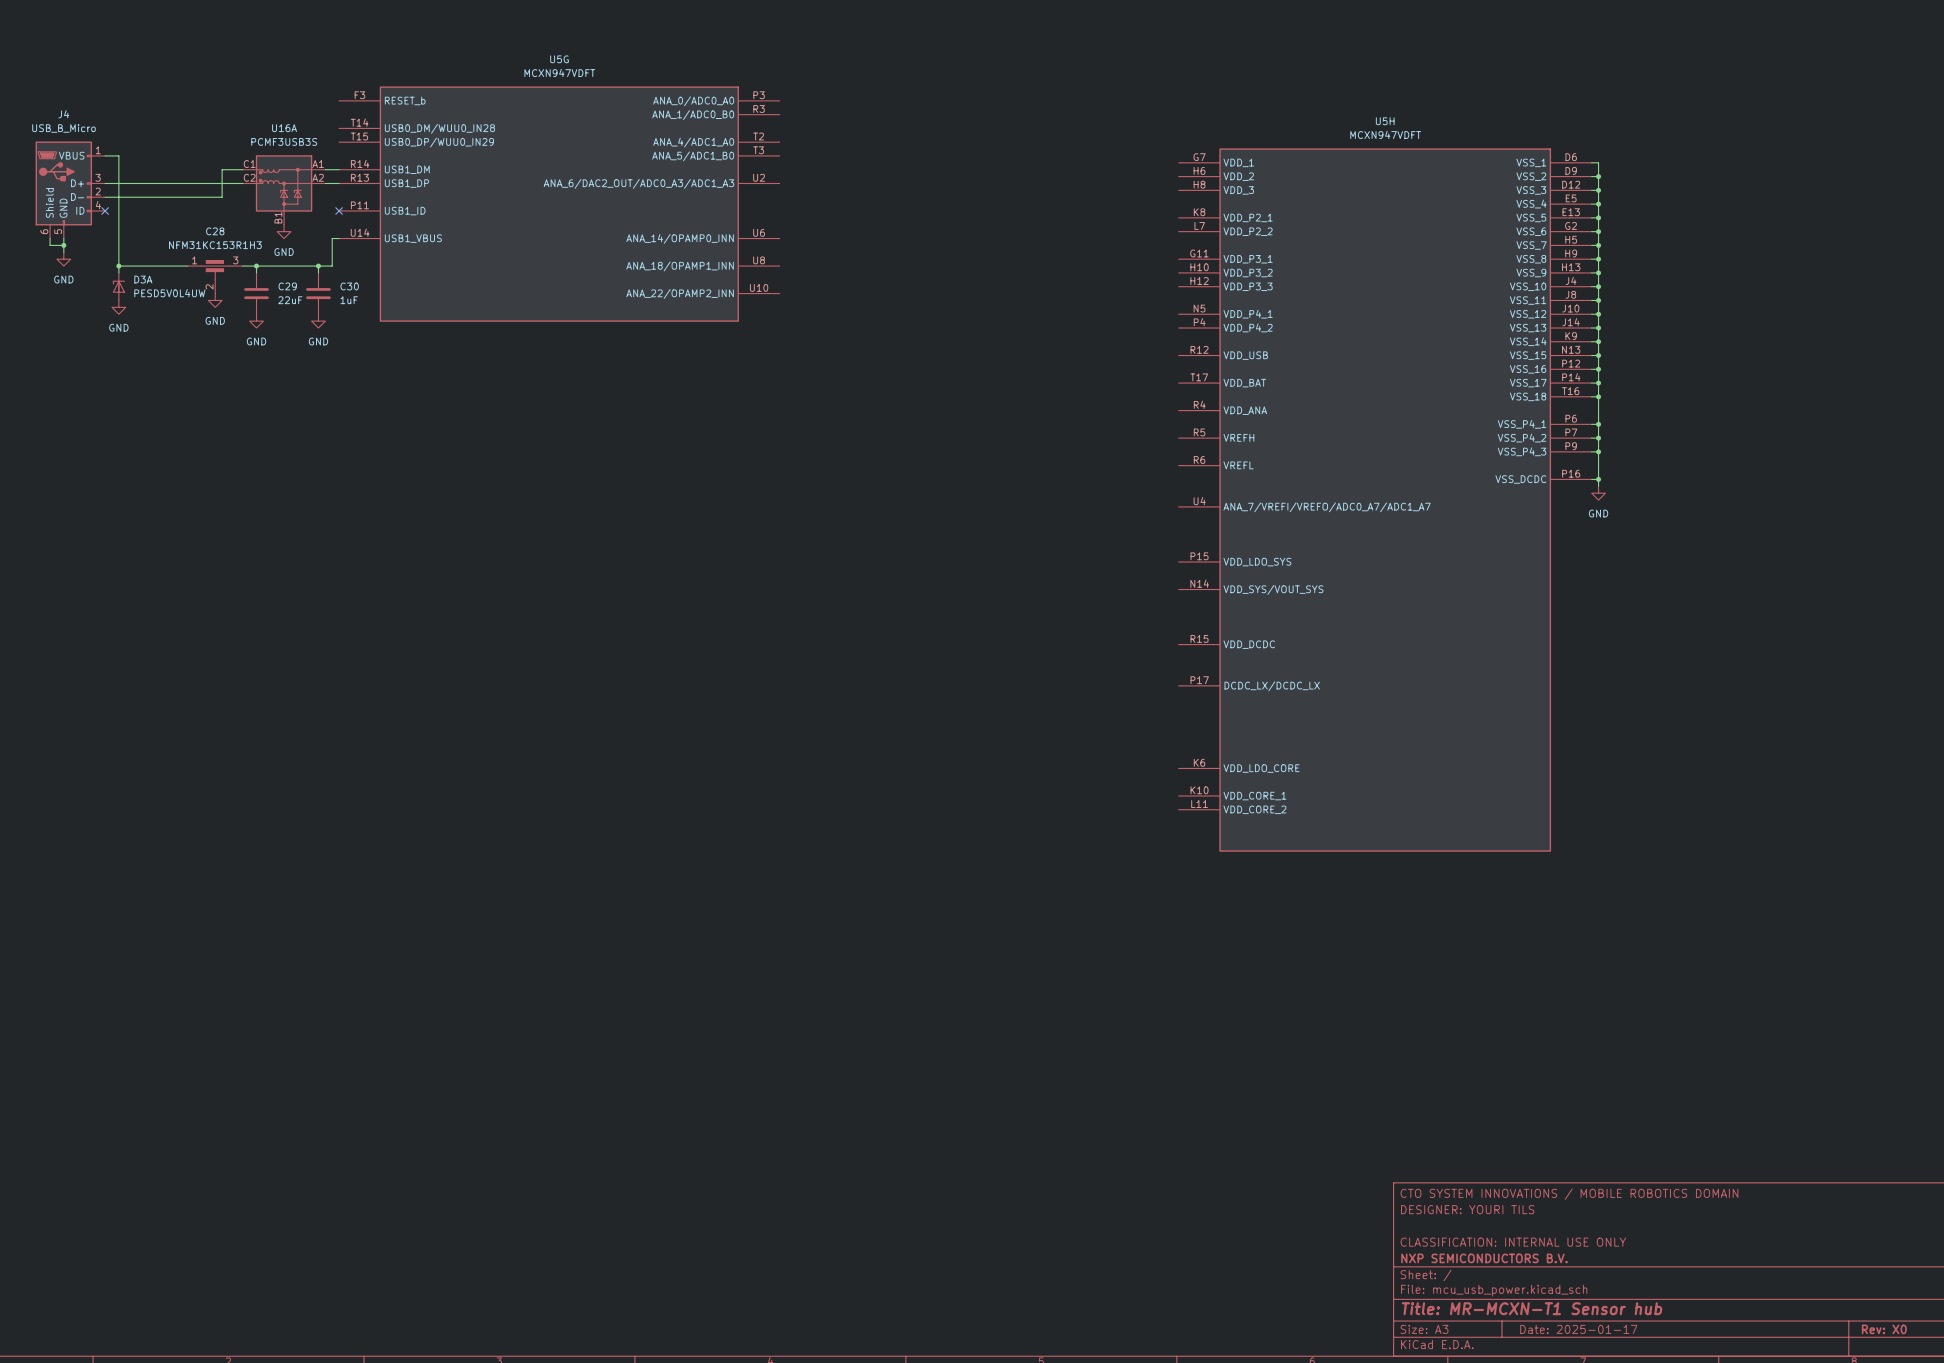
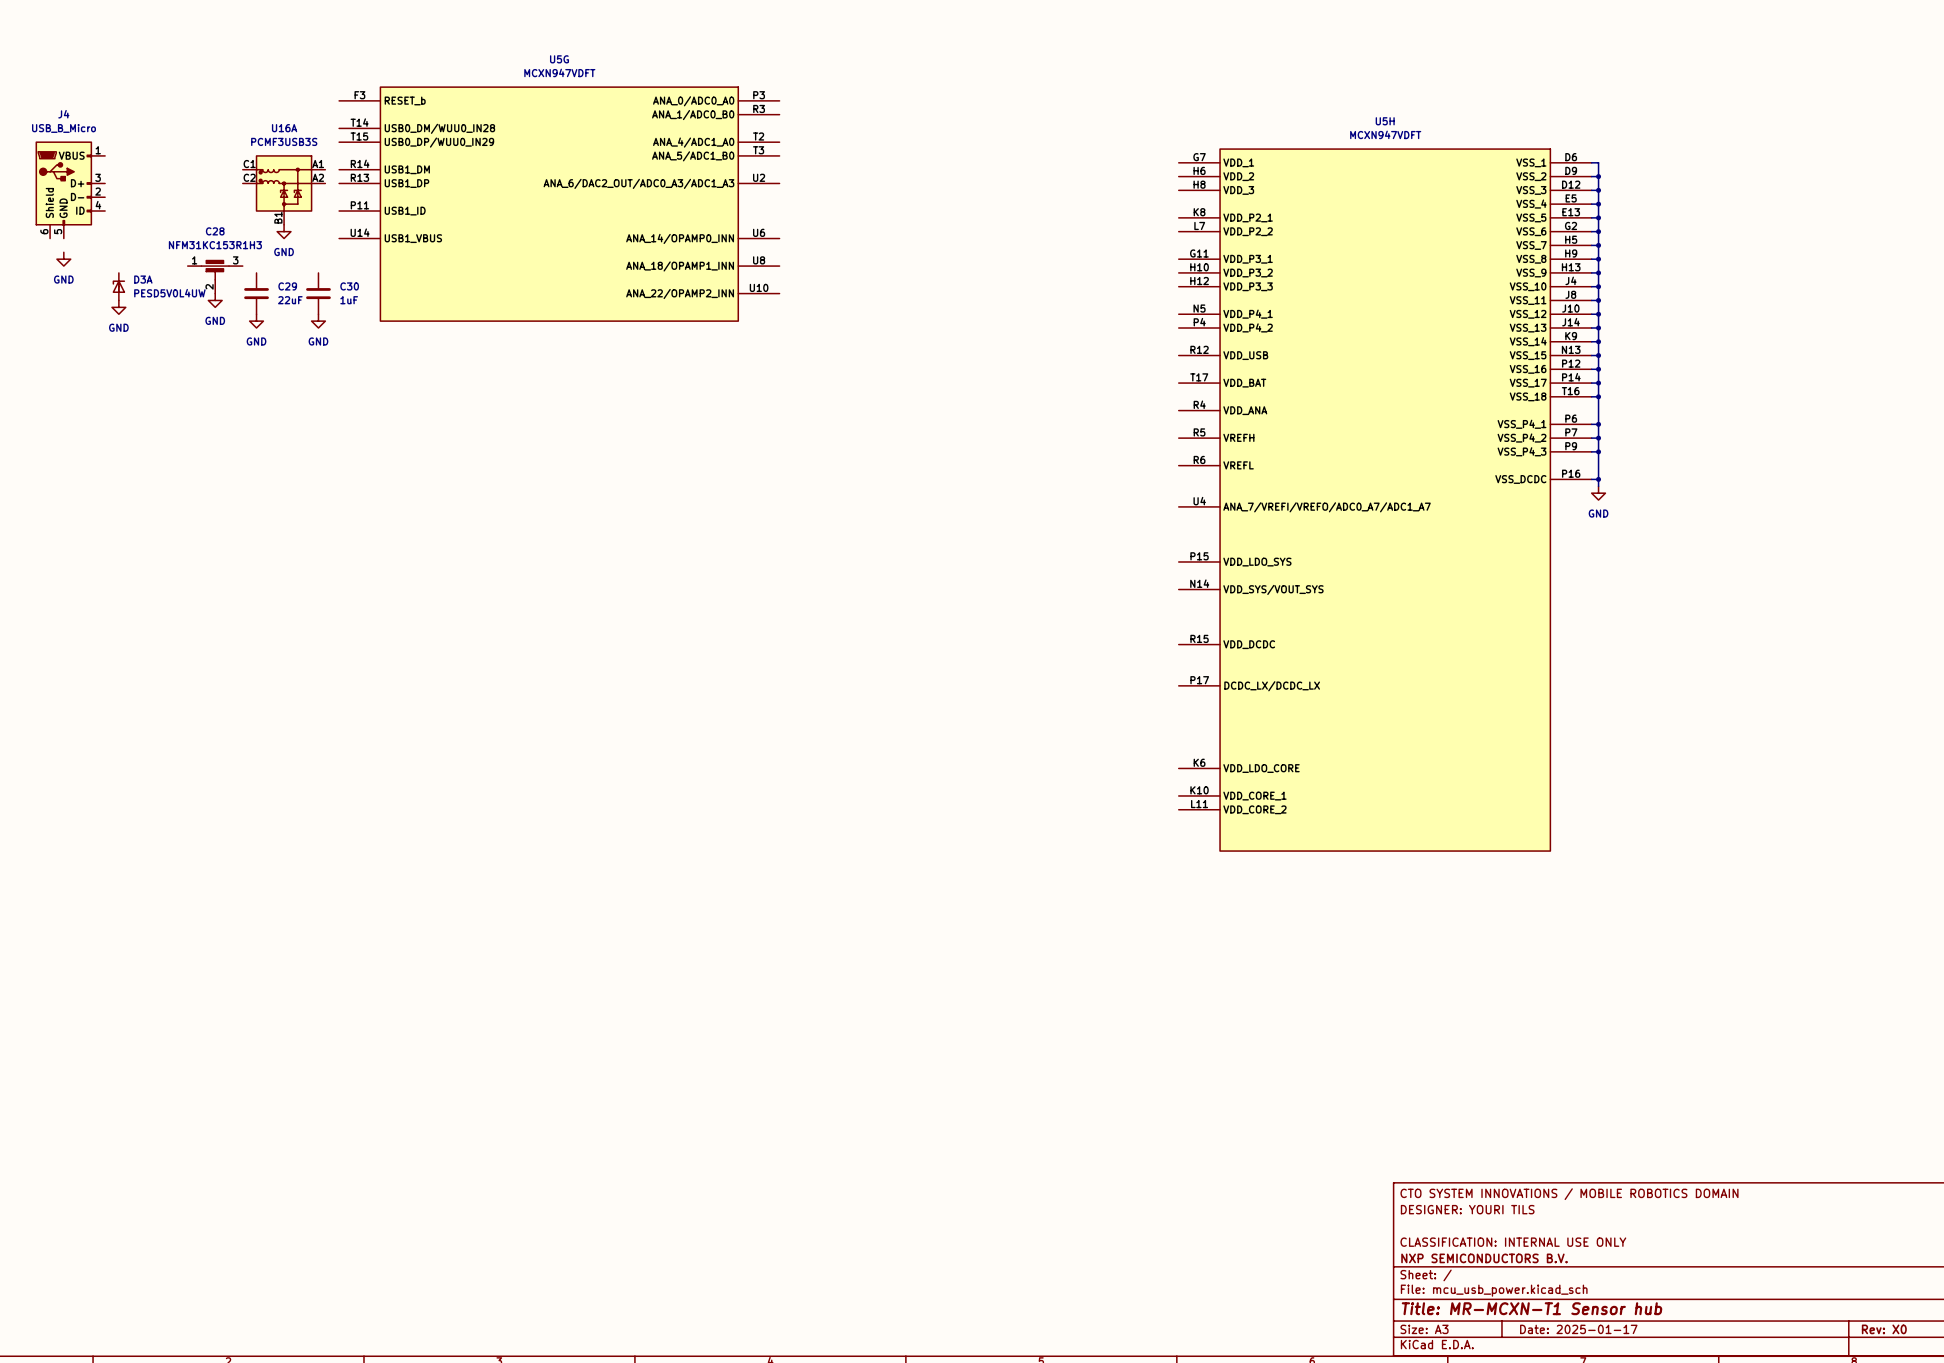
wire: (105, 155) (118, 155) (118, 272) -> none
wire: (242, 169) (222, 169) (222, 197) (105, 197) -> none
wire: (325, 169) (339, 169) -> none
wire: (105, 183) (242, 183) -> none
wire: (325, 183) (339, 183) -> none
no-connect mark: (105, 211) -> none
no-connect mark: (339, 211) -> none
wire: (50, 238) (50, 245) (63, 245) -> none
wire: (63, 238) (63, 252) -> none
wire: (339, 238) (332, 238) (332, 266) (242, 266) -> none
junction: (63, 245) -> none
wire: (118, 266) (187, 266) -> none
junction: (118, 266) -> none
wire: (256, 266) (256, 272) -> none
junction: (256, 266) -> none
wire: (318, 266) (318, 272) -> none
junction: (318, 266) -> none

